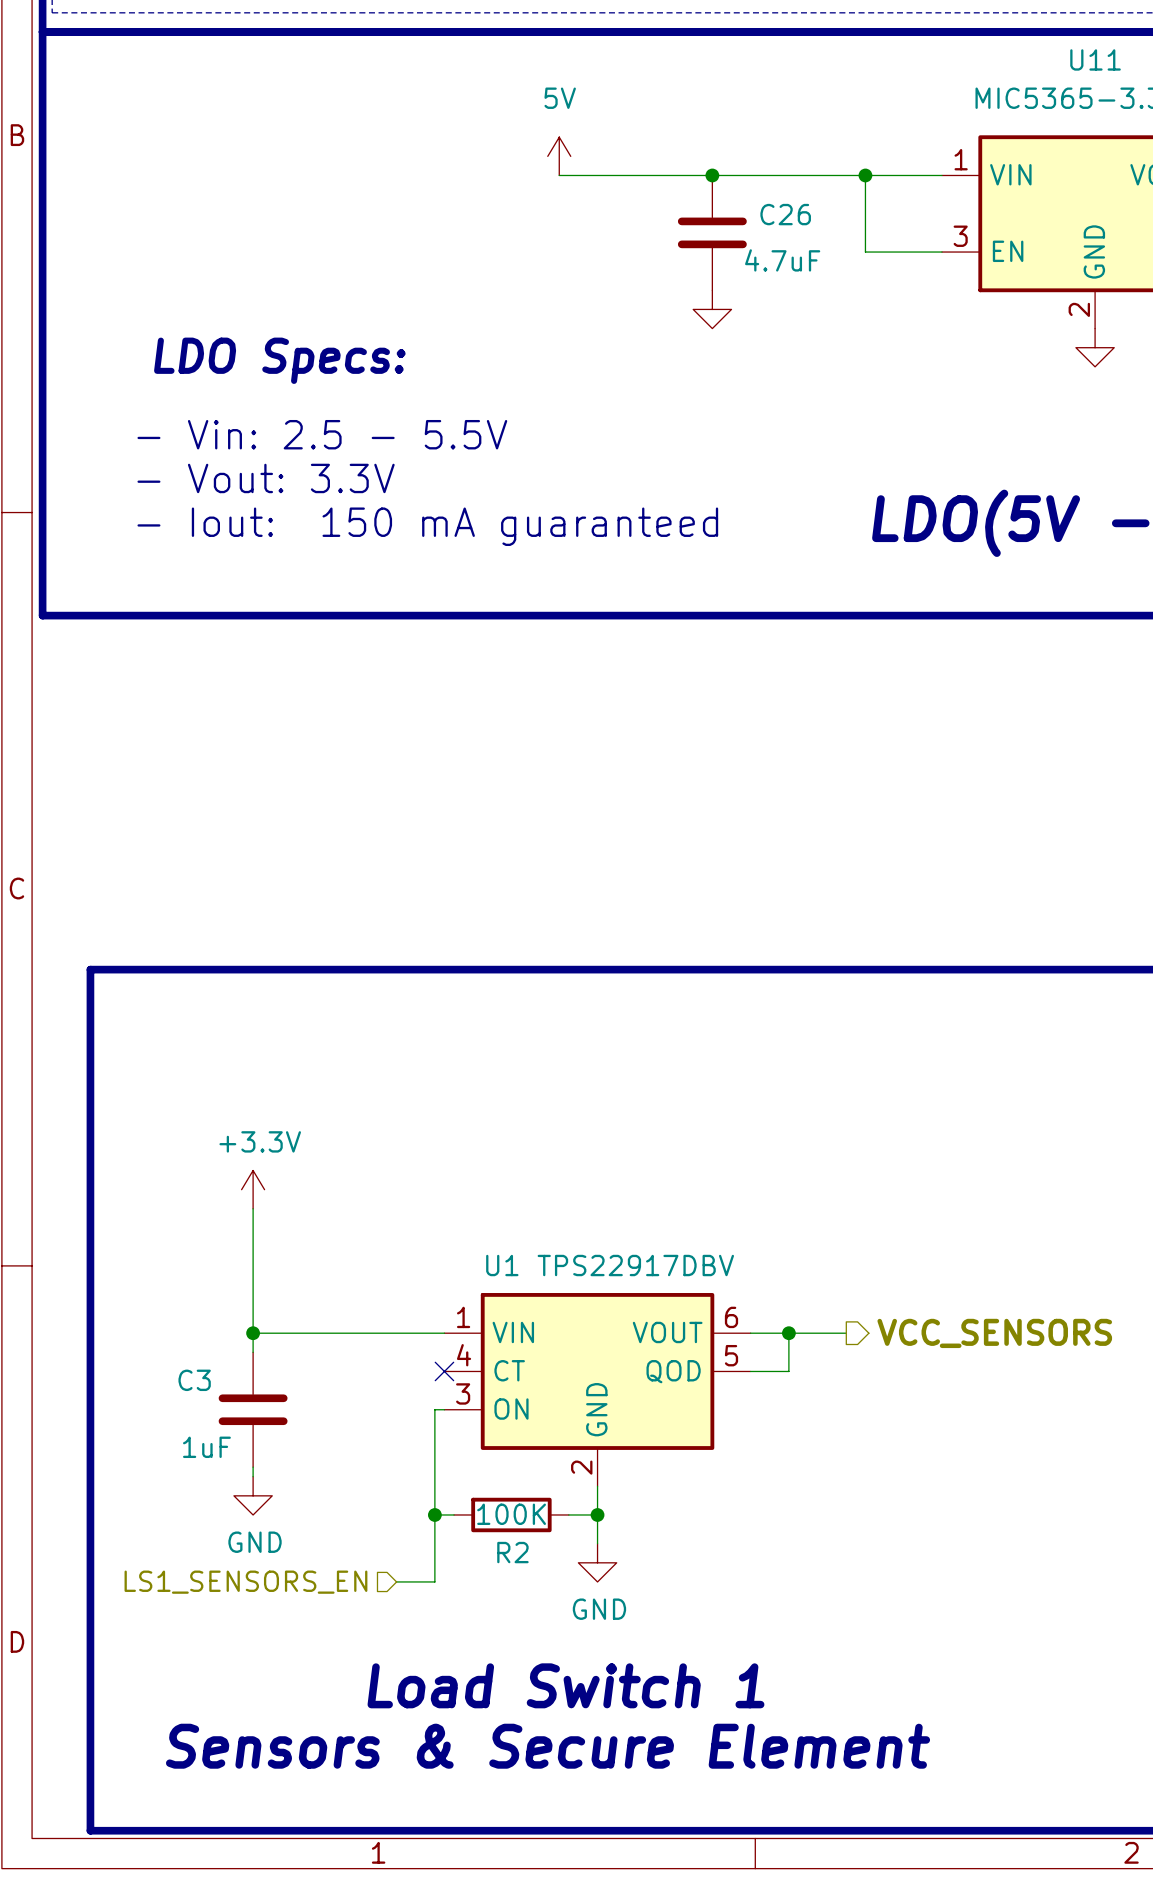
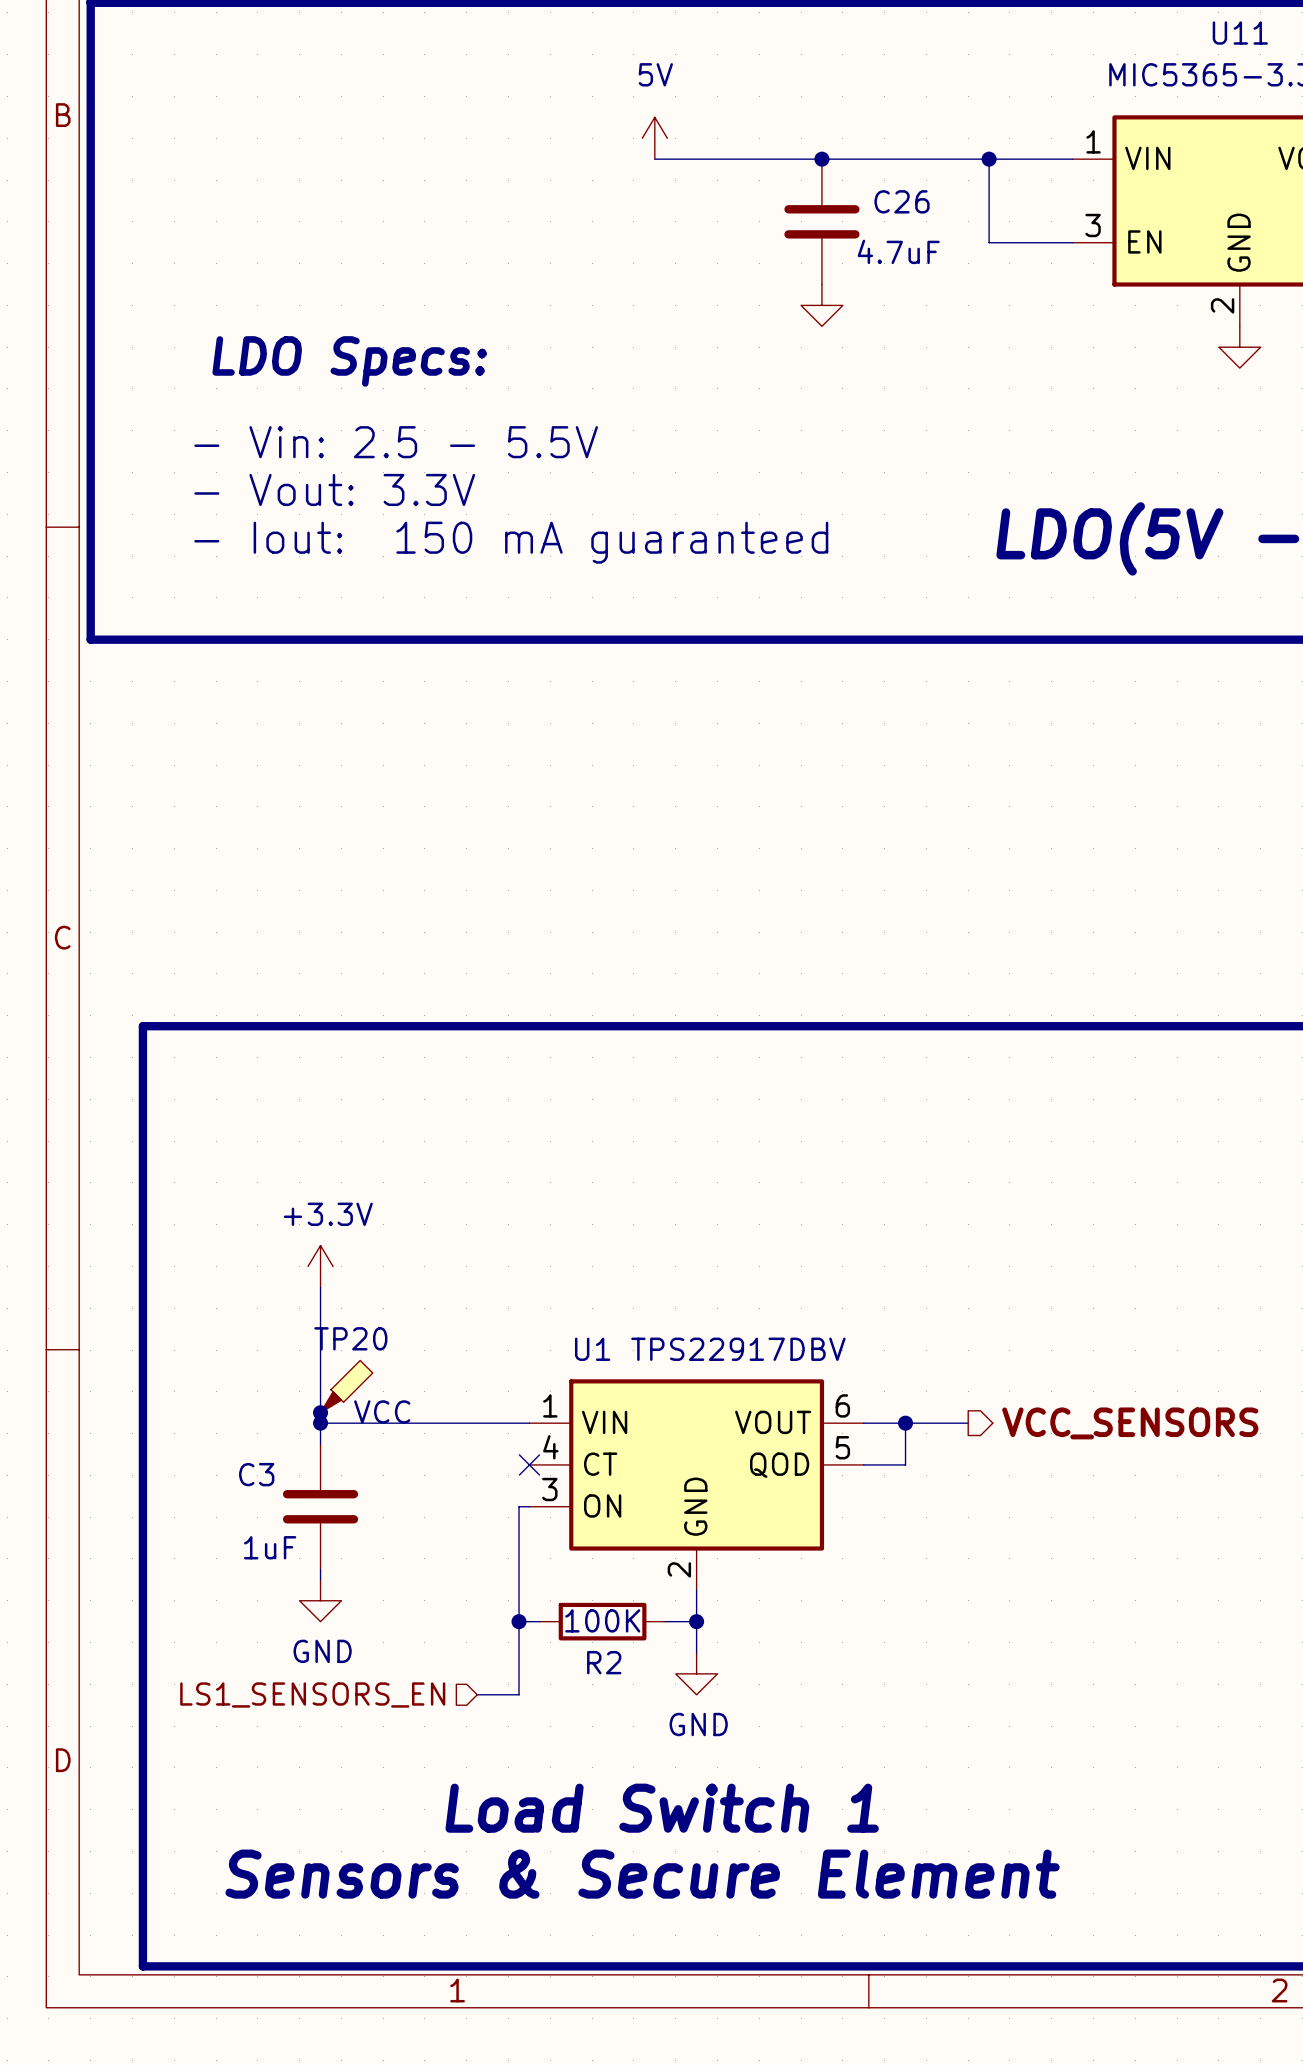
TP20: none -> VCC (346, 1386)
junction: none -> (320, 1412)

